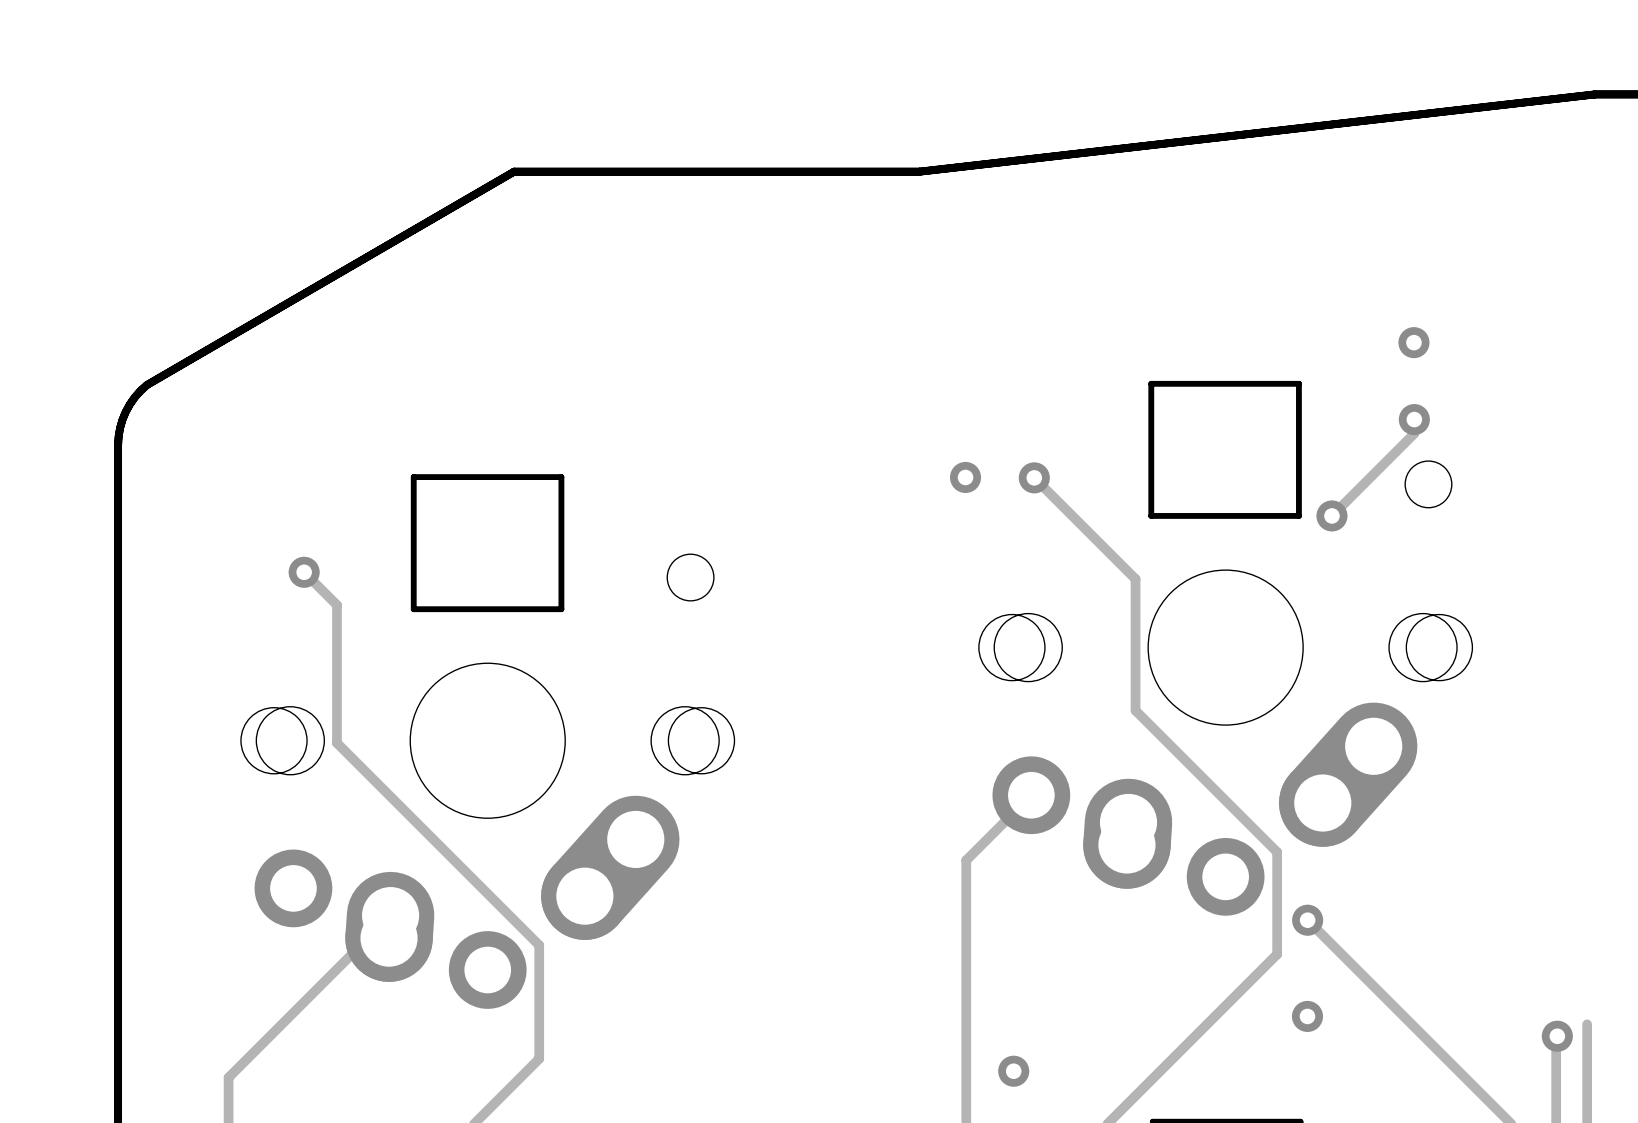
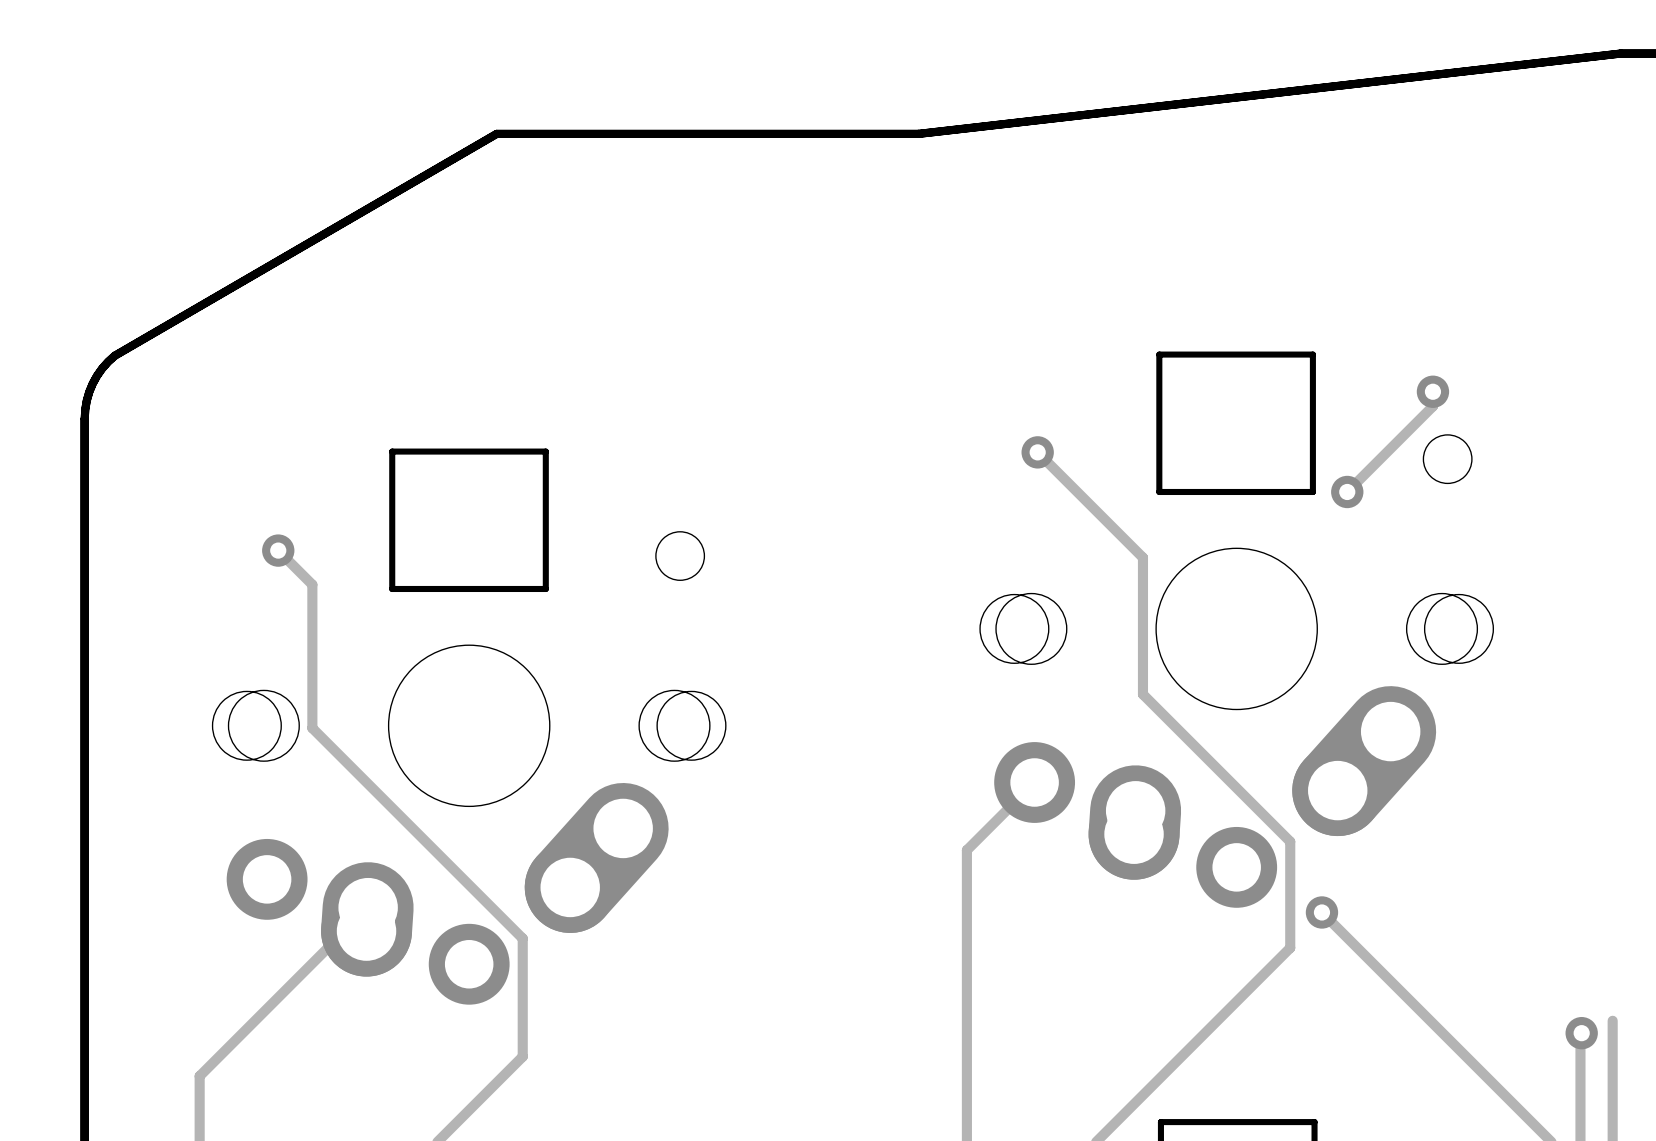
via: (1413, 342) -> none
via: (965, 477) -> none
via: (1307, 1016) -> none
via: (1013, 1071) -> none

